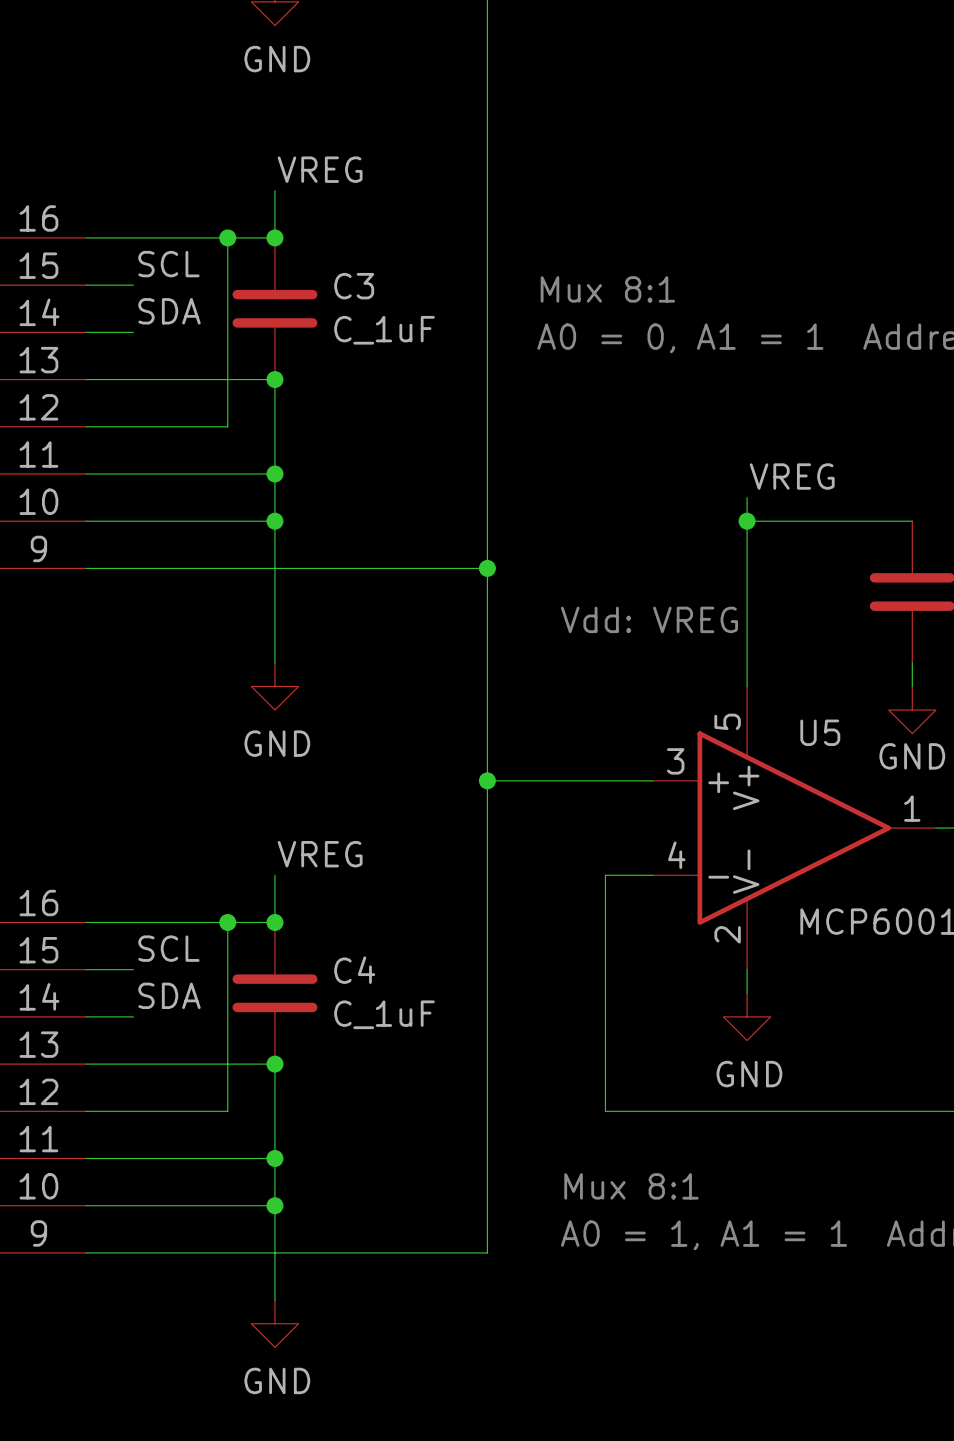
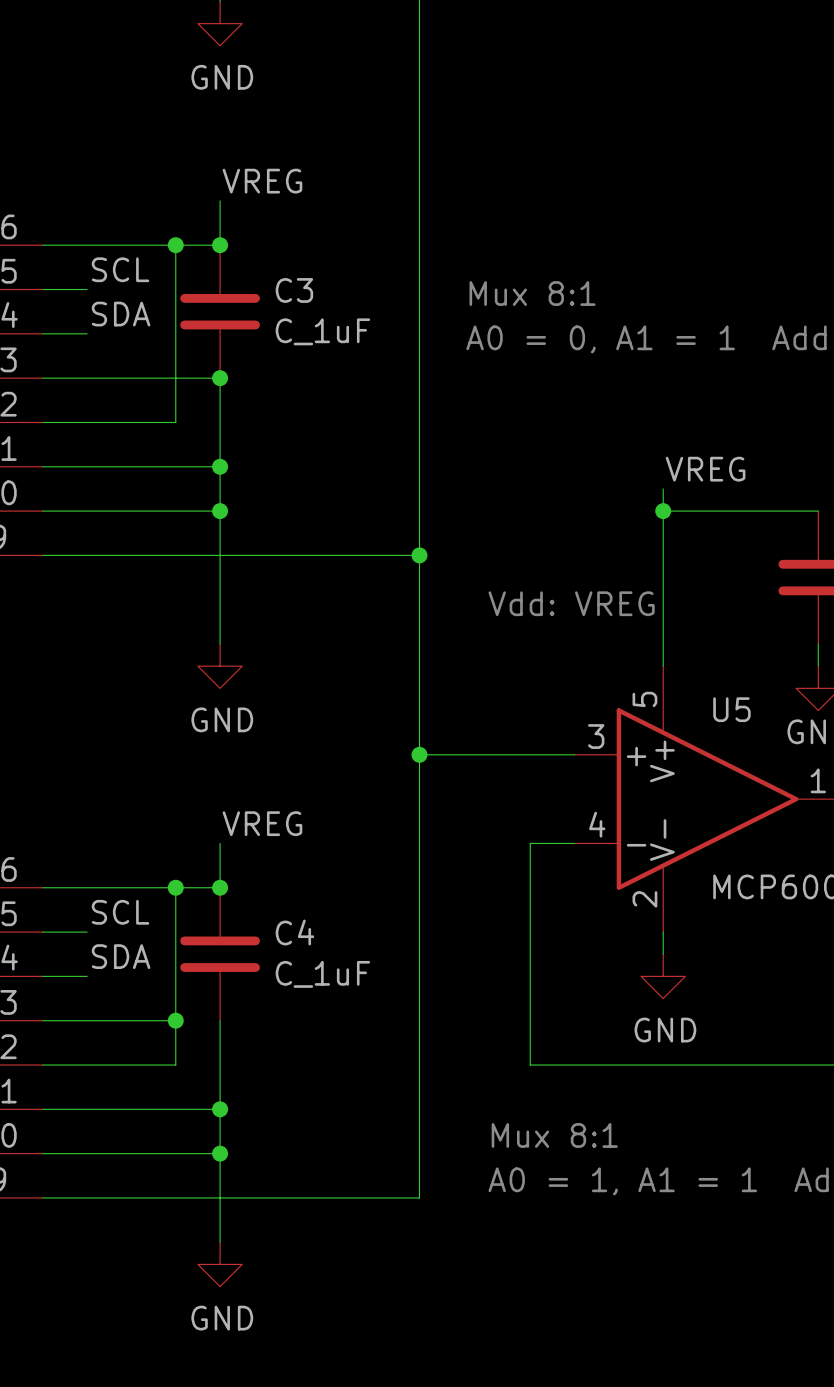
wire: (227, 1064) (274, 1064) -> none
junction position: (274, 1064) -> (175, 1020)

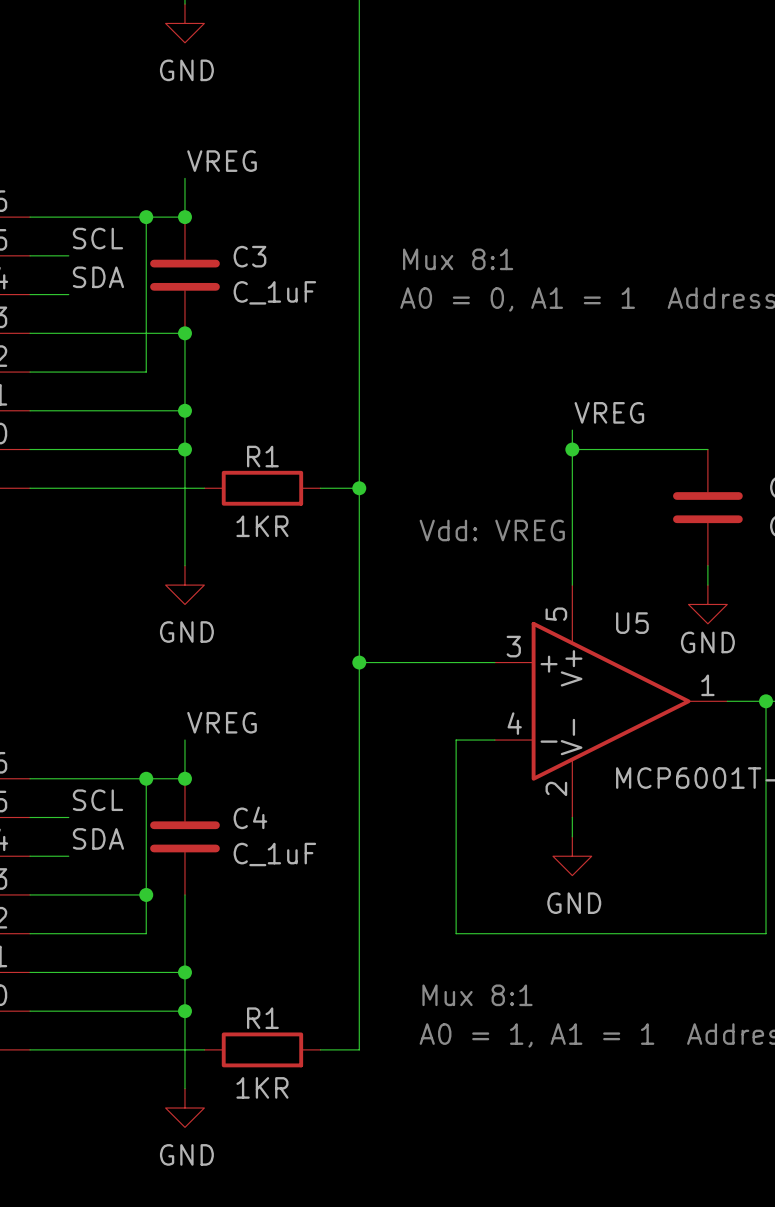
wire: (242, 555) (375, 555) -> none
R1: none -> 1KR (262, 488)
wire: (242, 1197) (375, 1197) -> none
R1: none -> 1KR (262, 1049)

